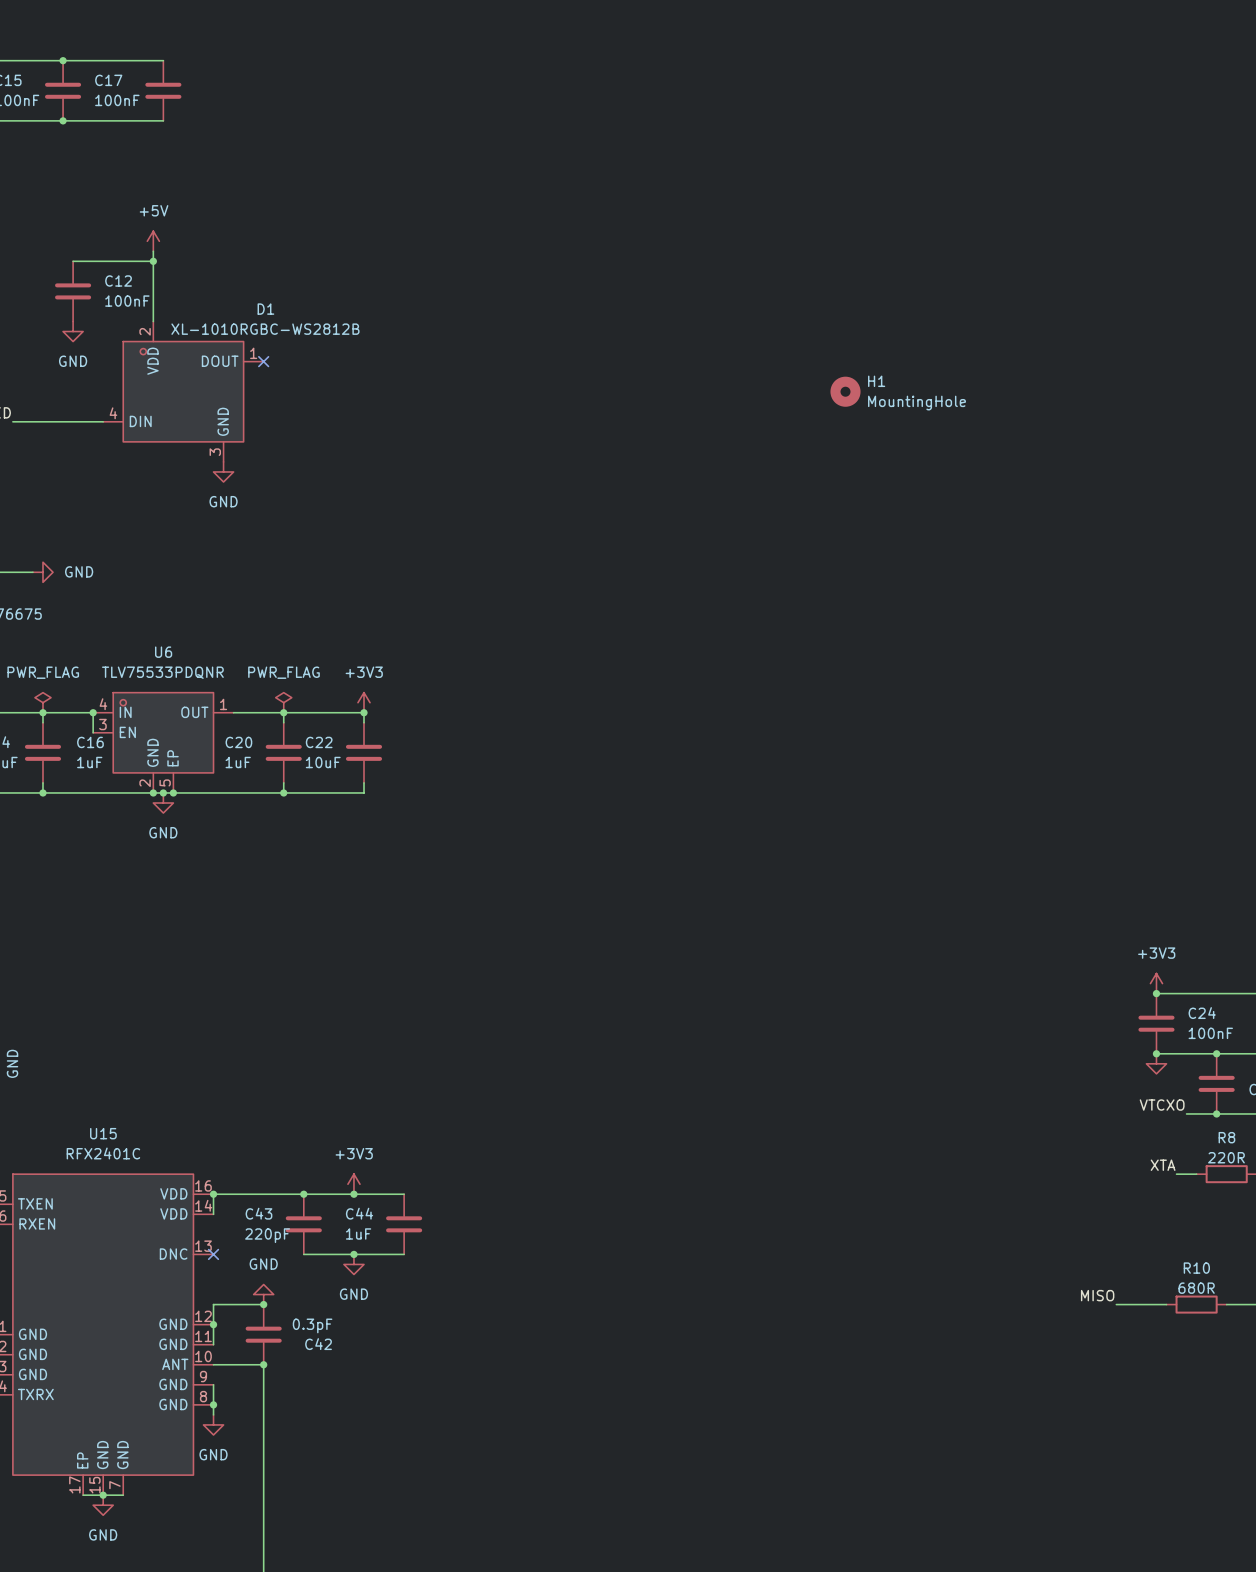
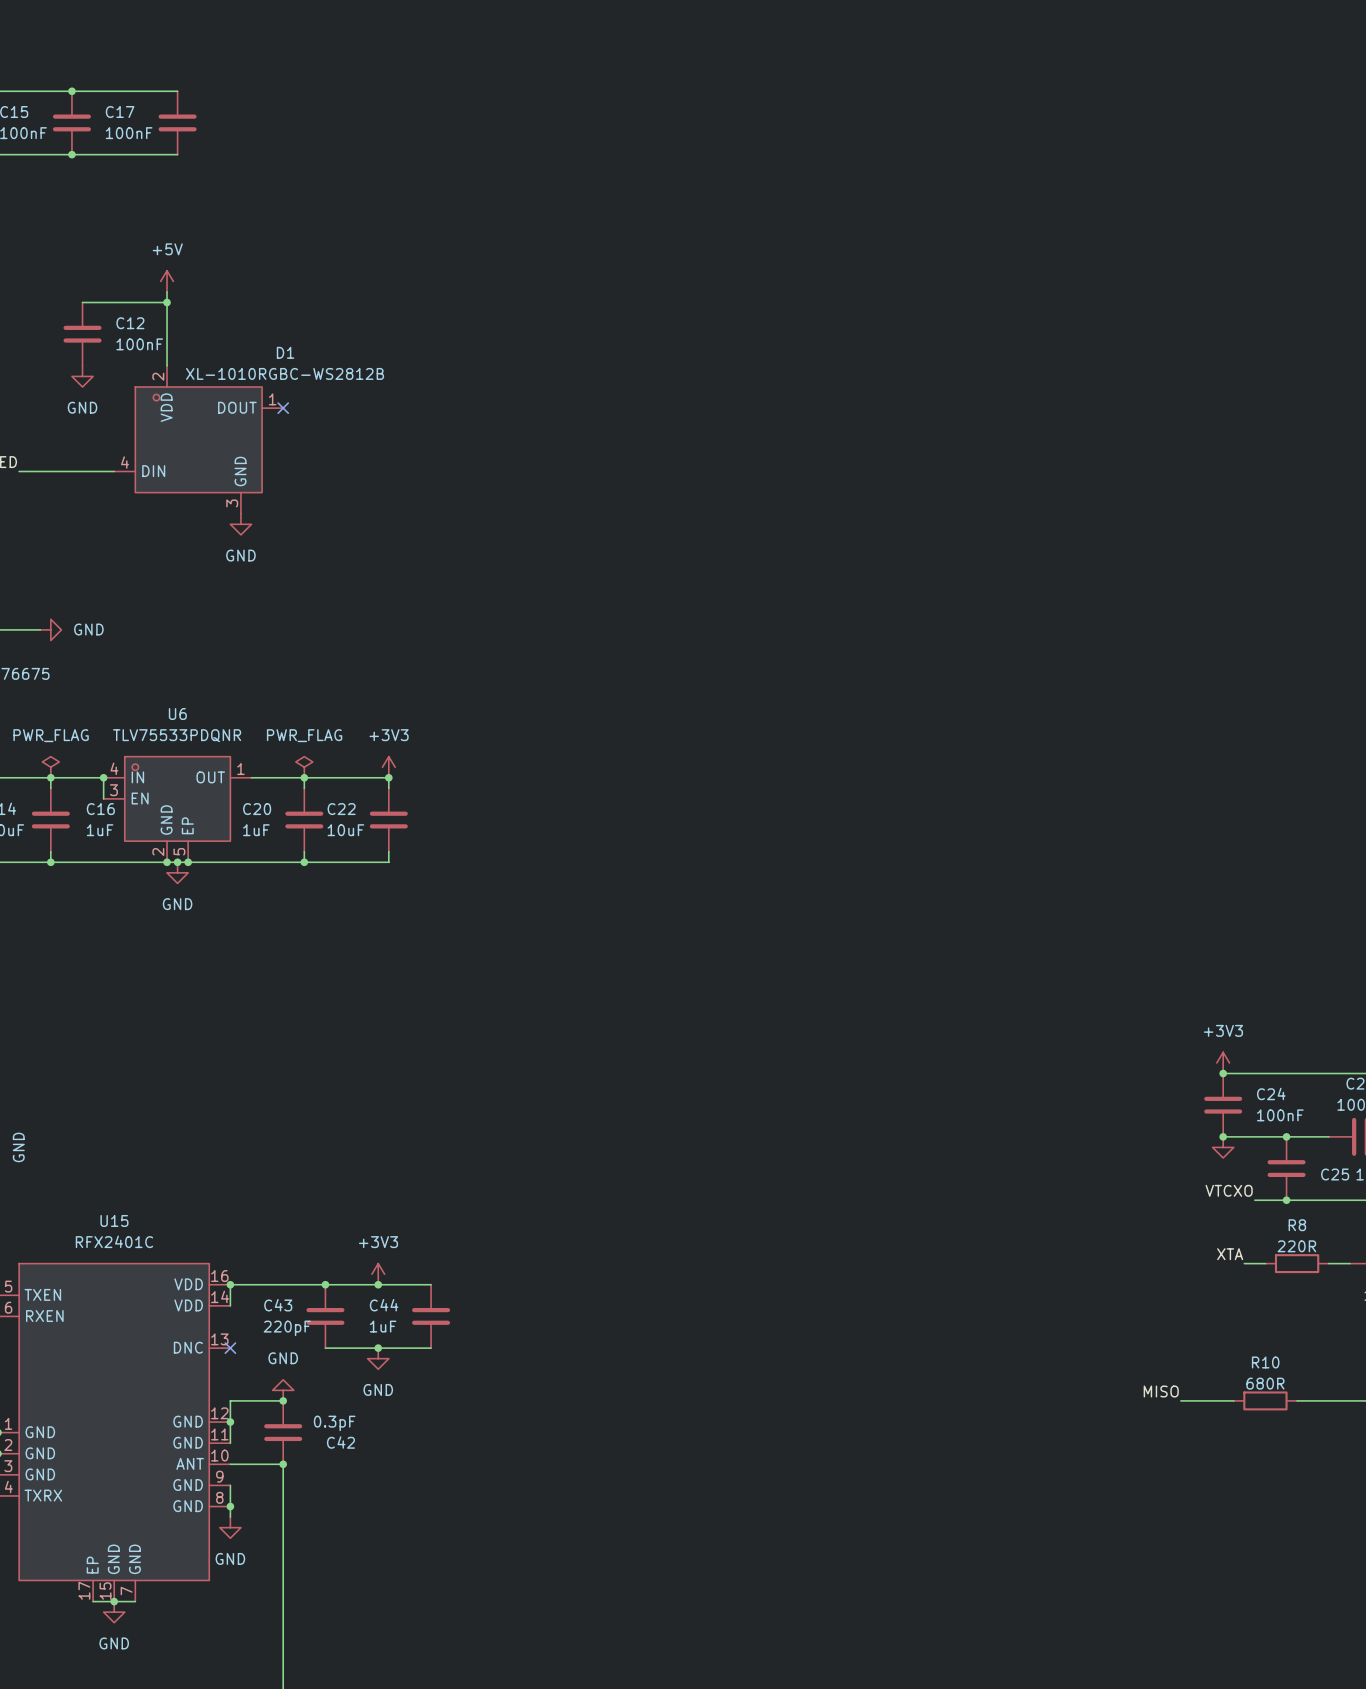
H1: MountingHole (845, 391) -> none

